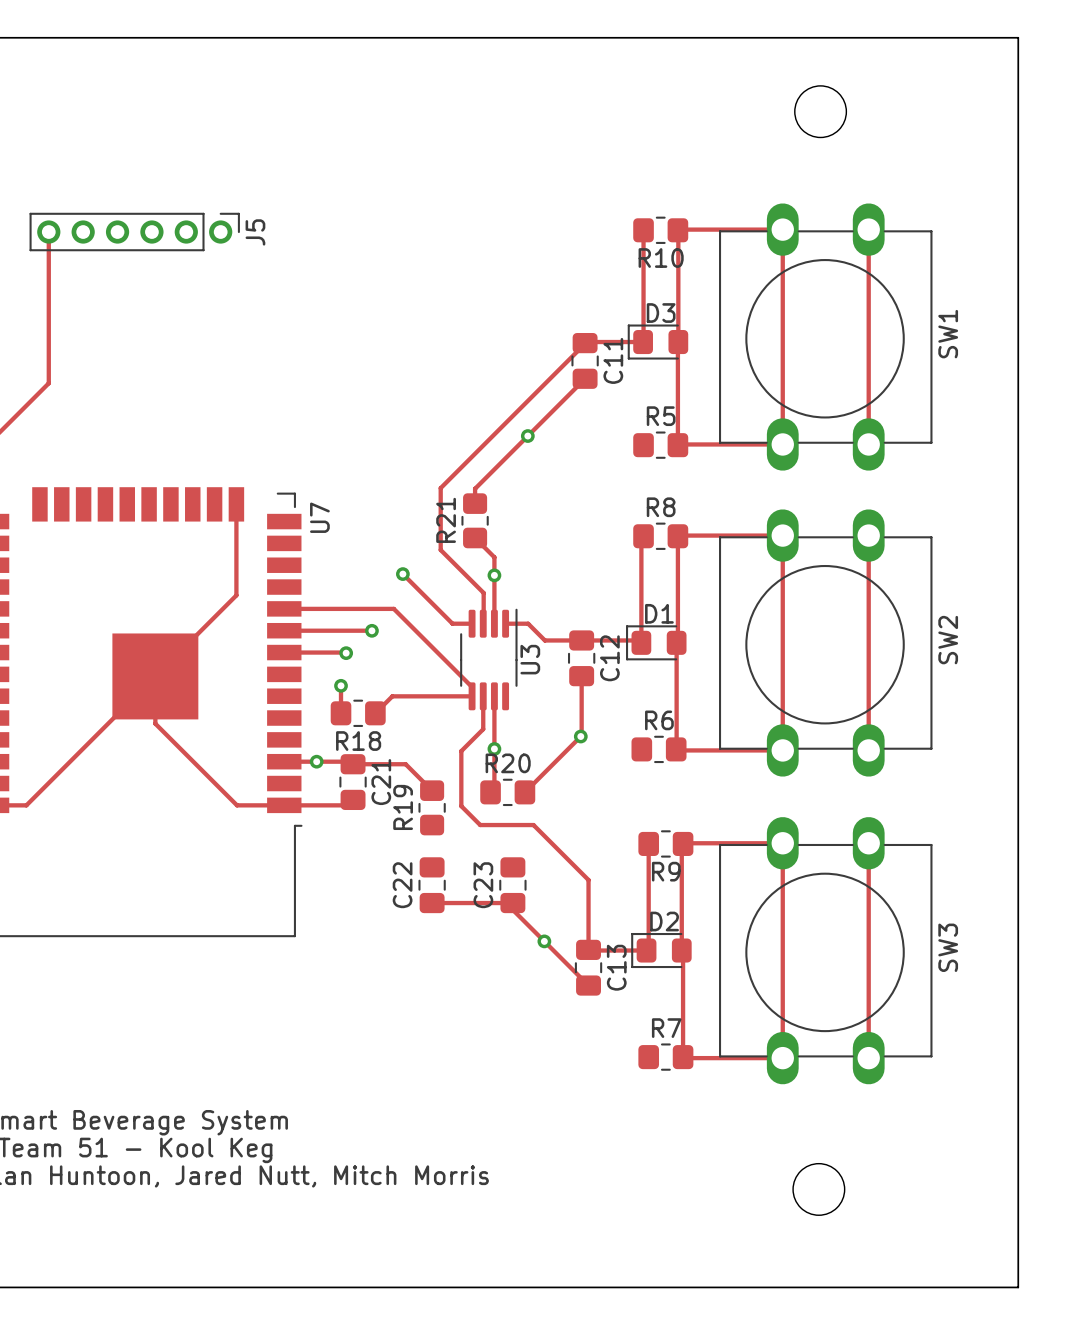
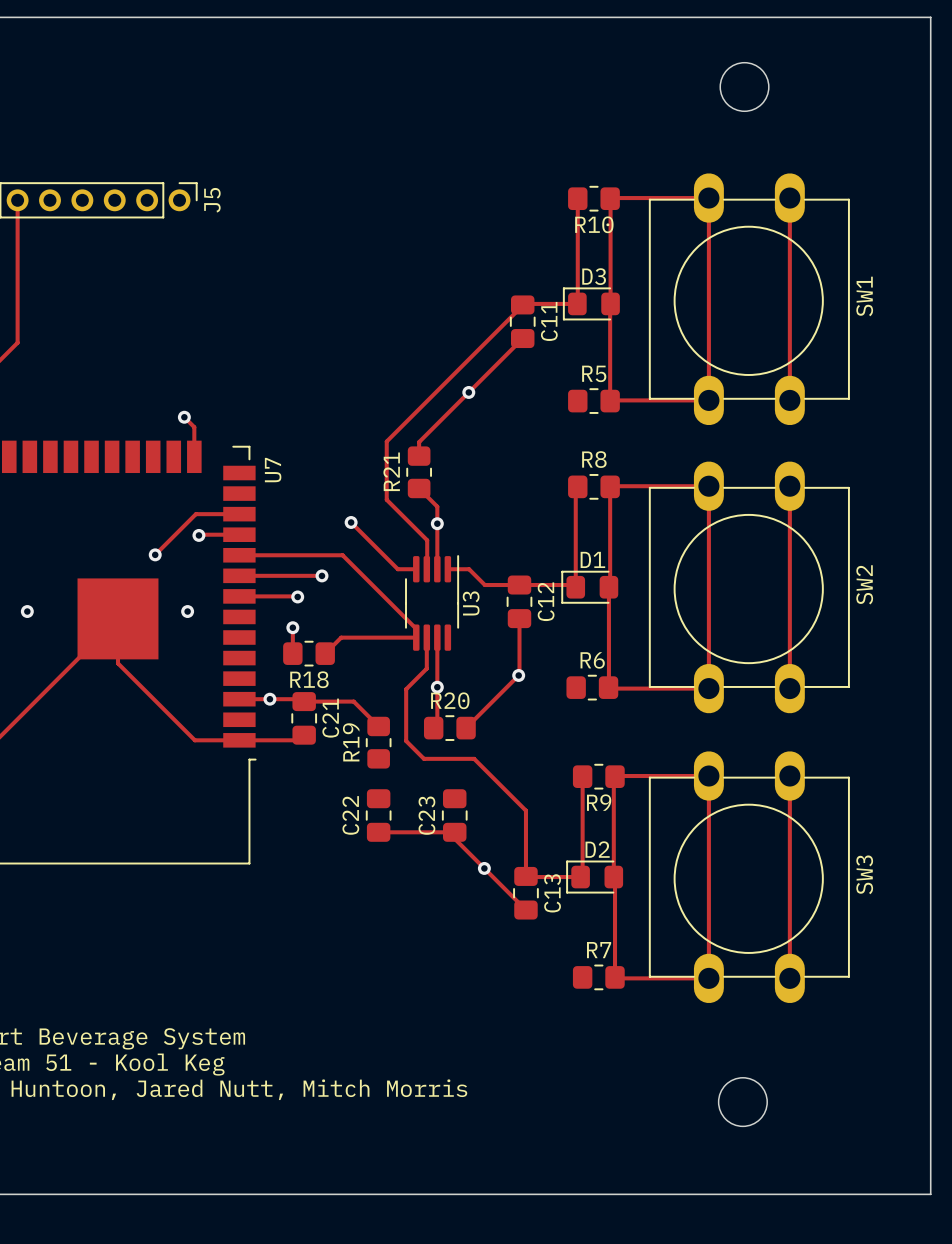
via: none -> (184, 417)
track: (236, 504) (236, 595) (155, 676) -> (194, 456) (194, 427) (184, 417)
track: none -> (239, 514) (195, 514) (155, 554)
via: none -> (198, 535)
track: none -> (239, 534) (198, 535)
via: none -> (155, 554)
via: none -> (27, 611)
via: none -> (187, 611)

